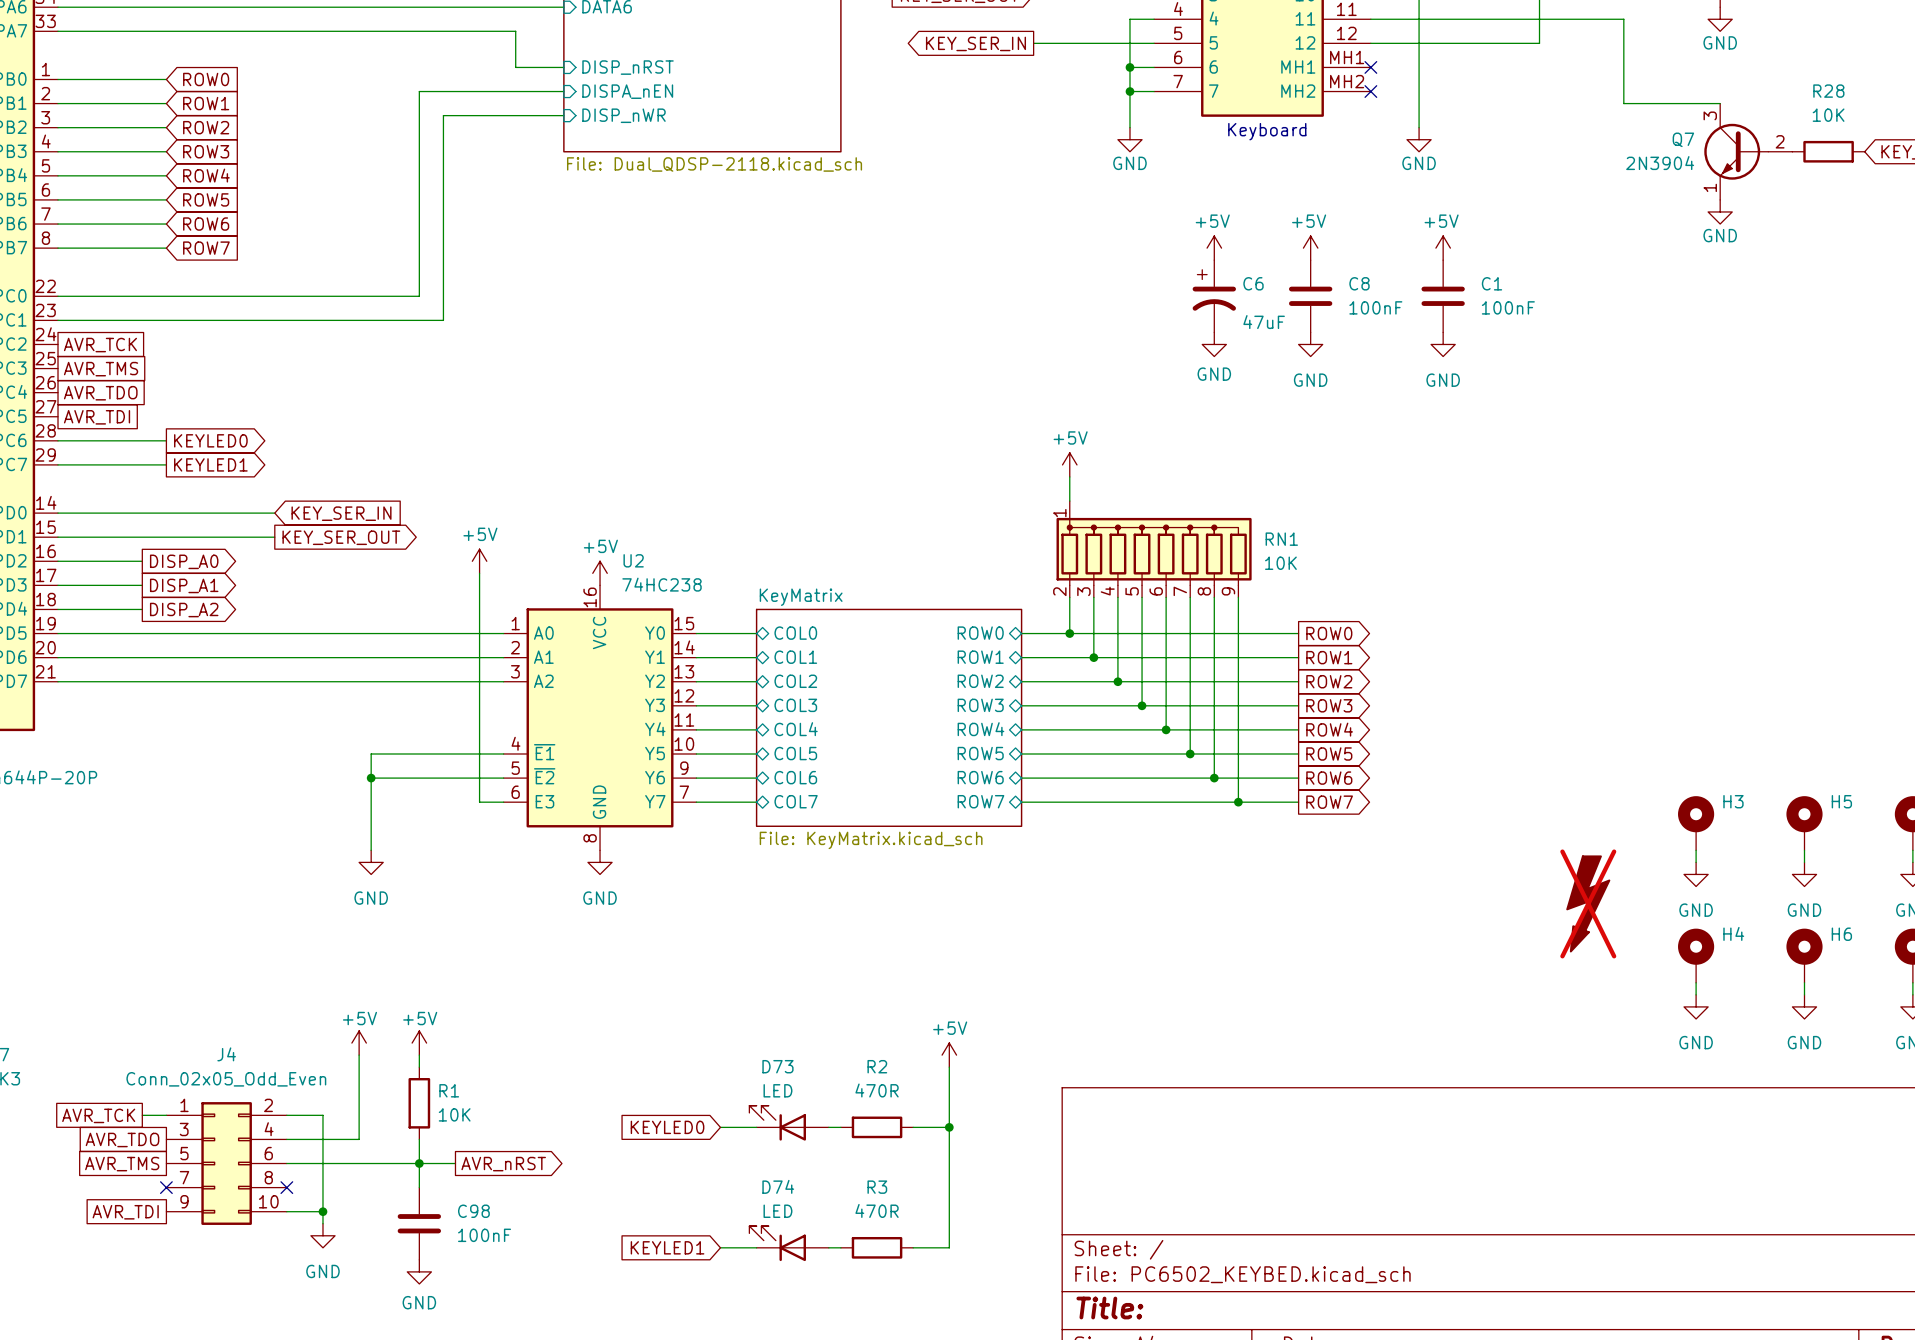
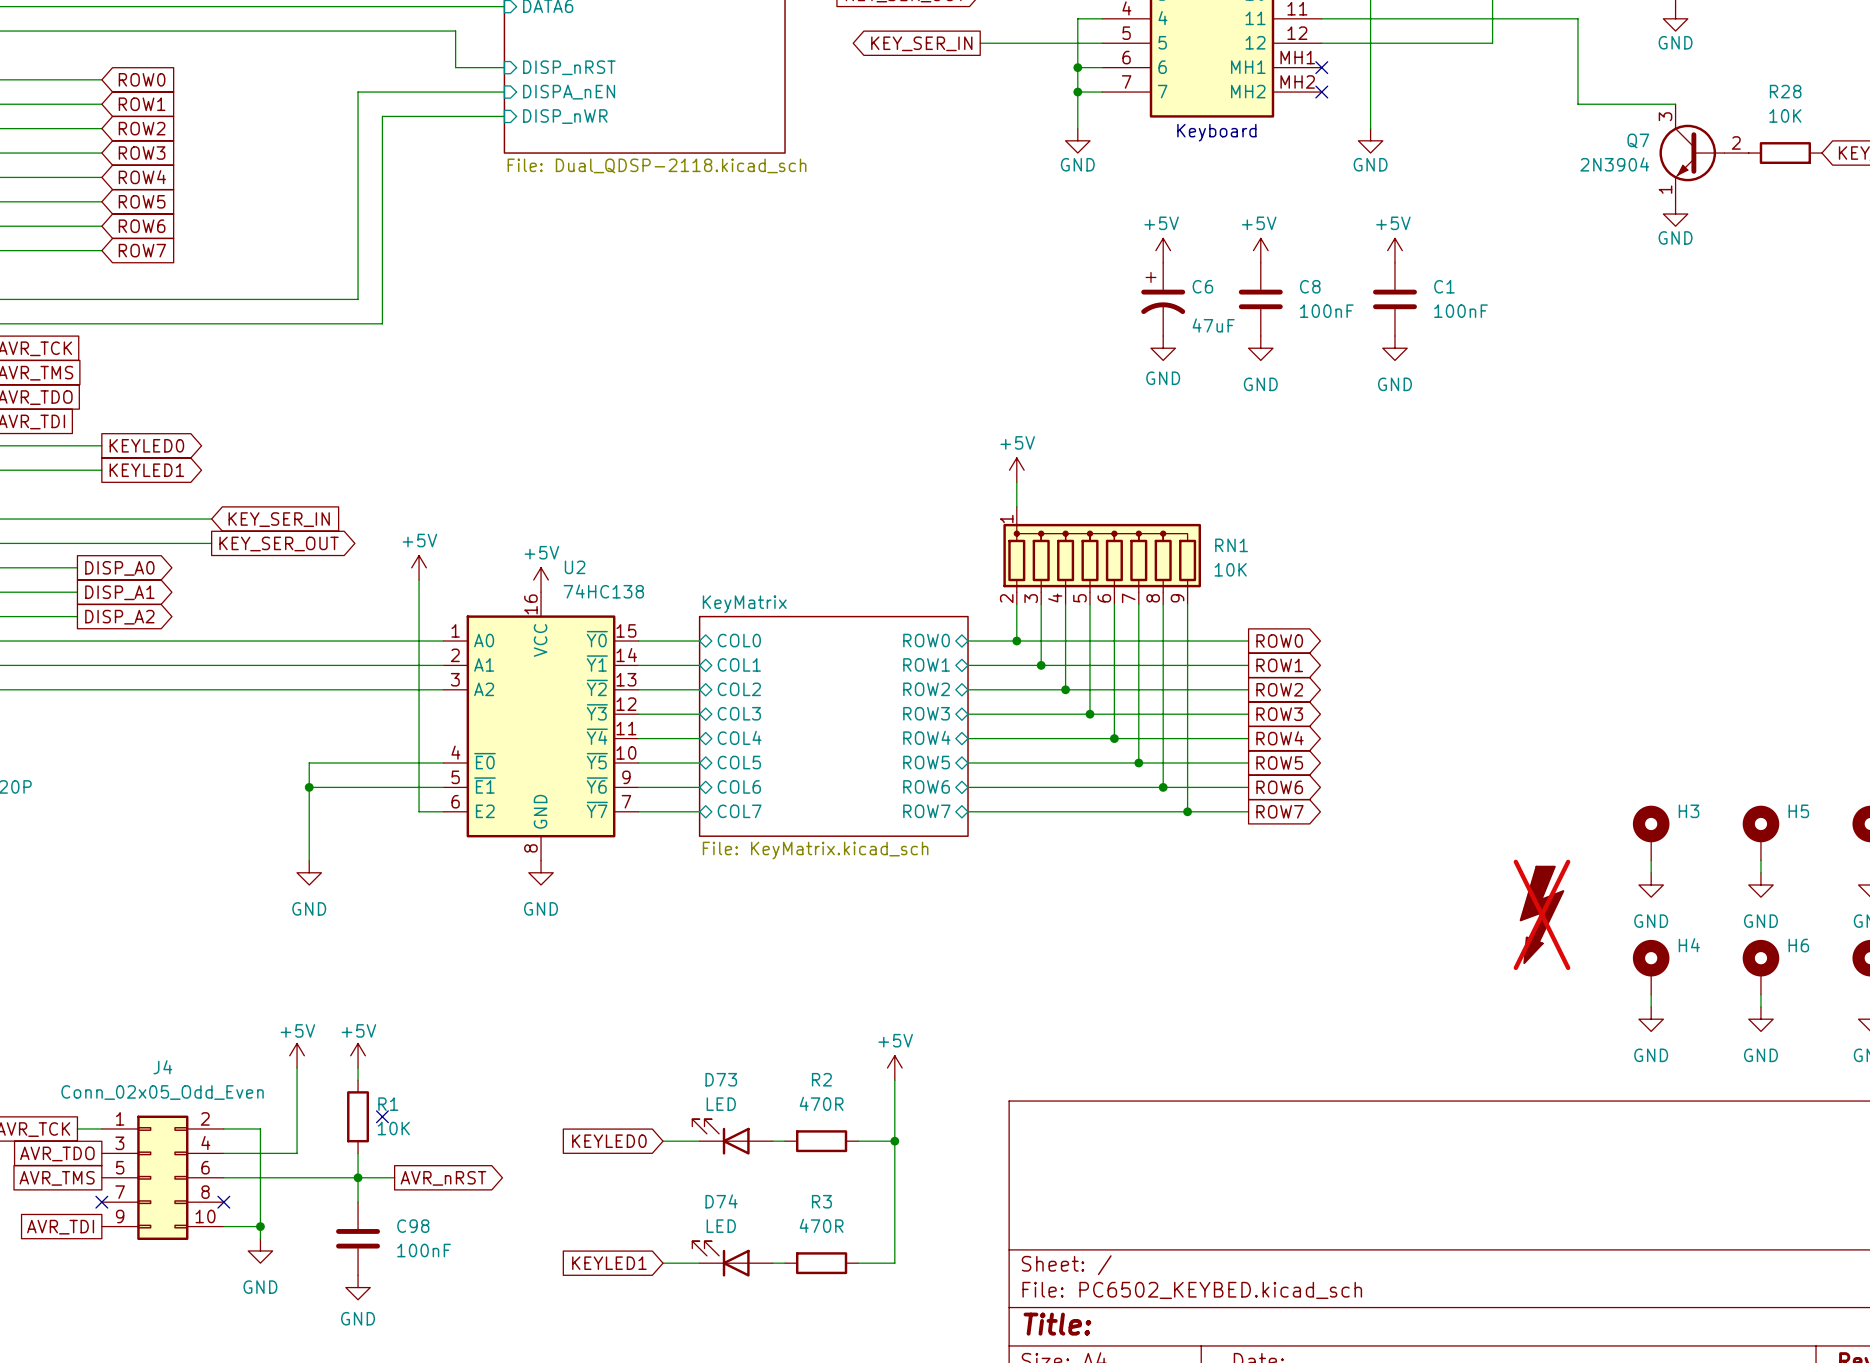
U2 value: 74HC238 (662, 584) -> 74HC138 (603, 591)
U2 symbol: [503, 585, 697, 851] -> [443, 592, 639, 861]
no-connect mark: none -> (382, 1116)

